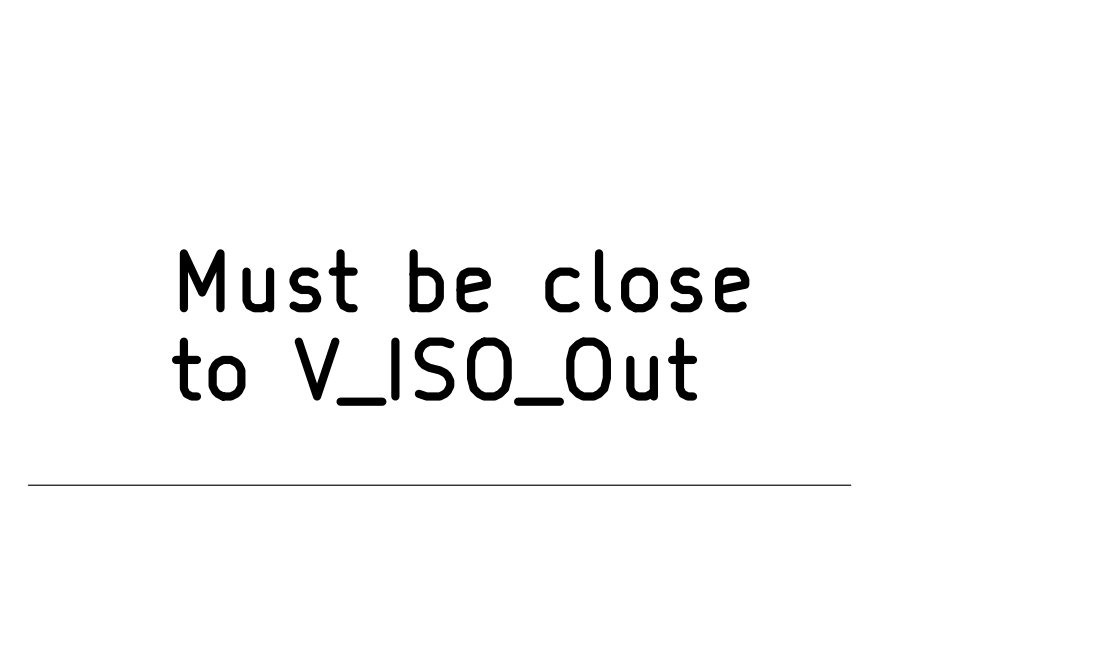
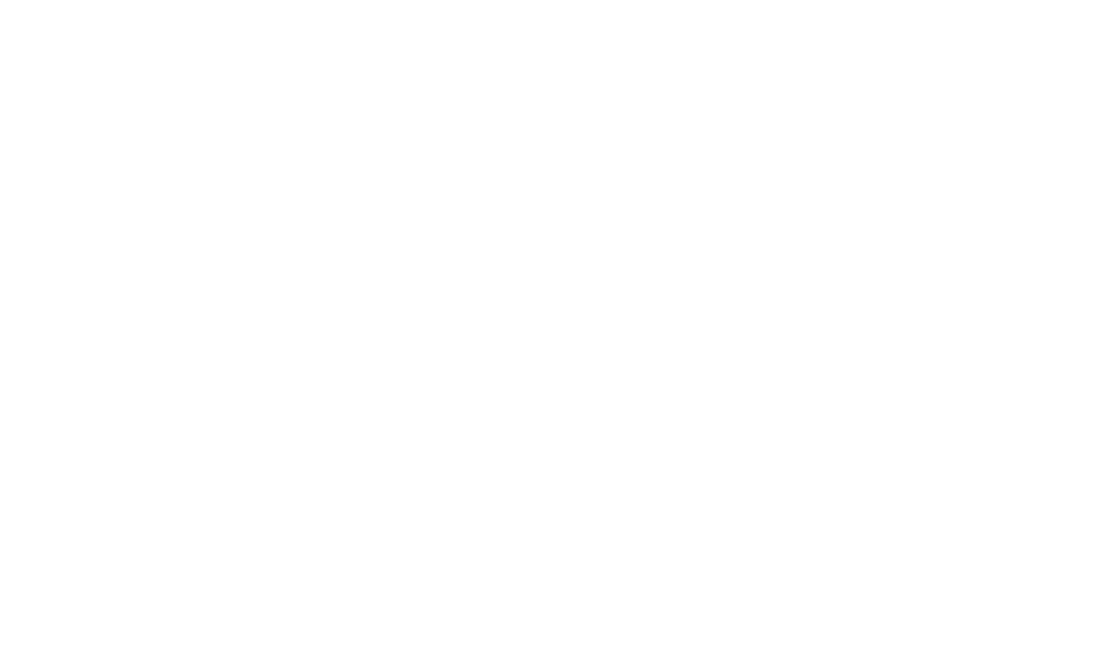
text: Must be close (464, 280) -> none
text: to V_ISO_Out (434, 371) -> none
line: (28, 485) (850, 485) -> none

